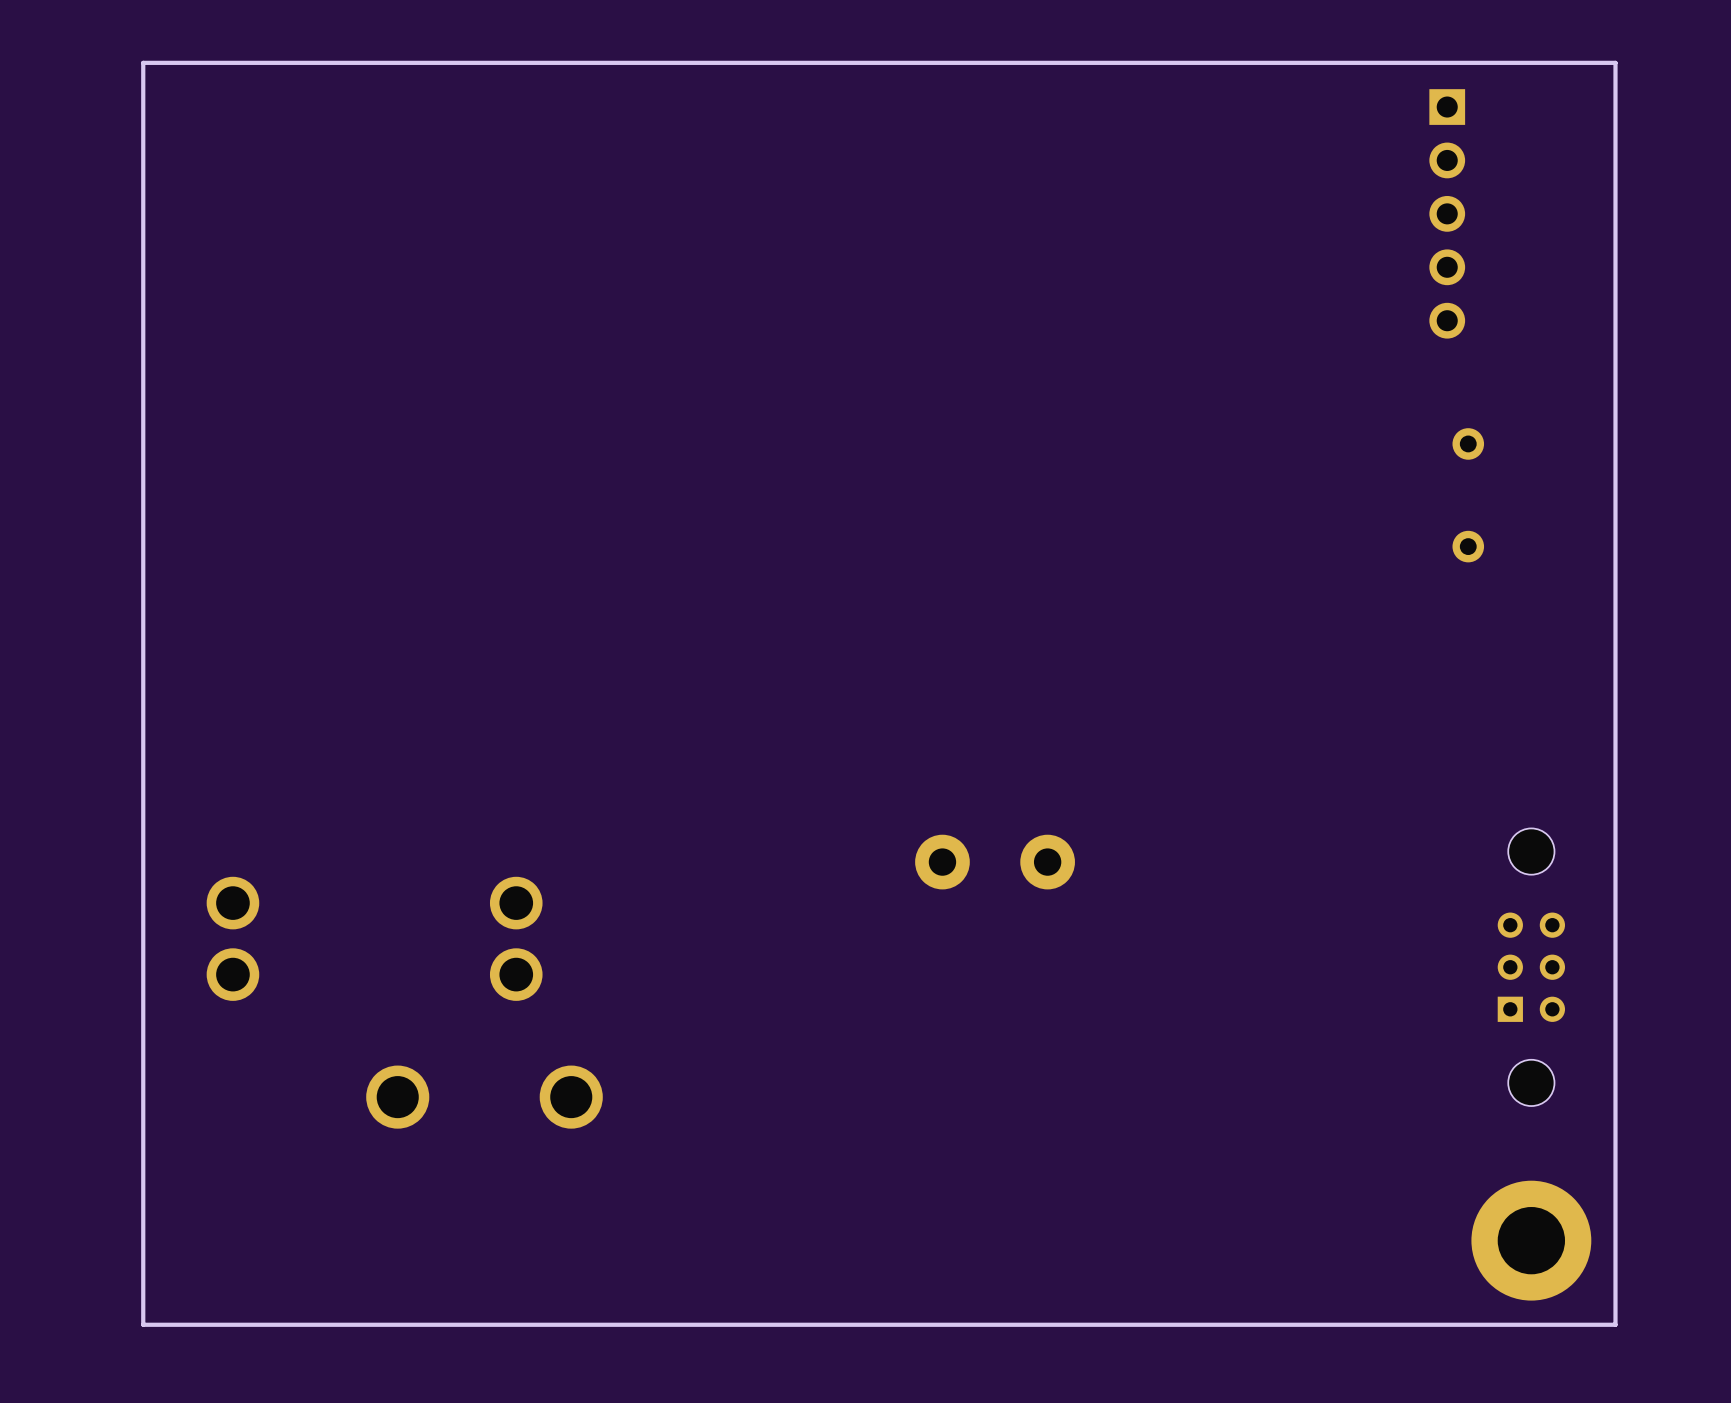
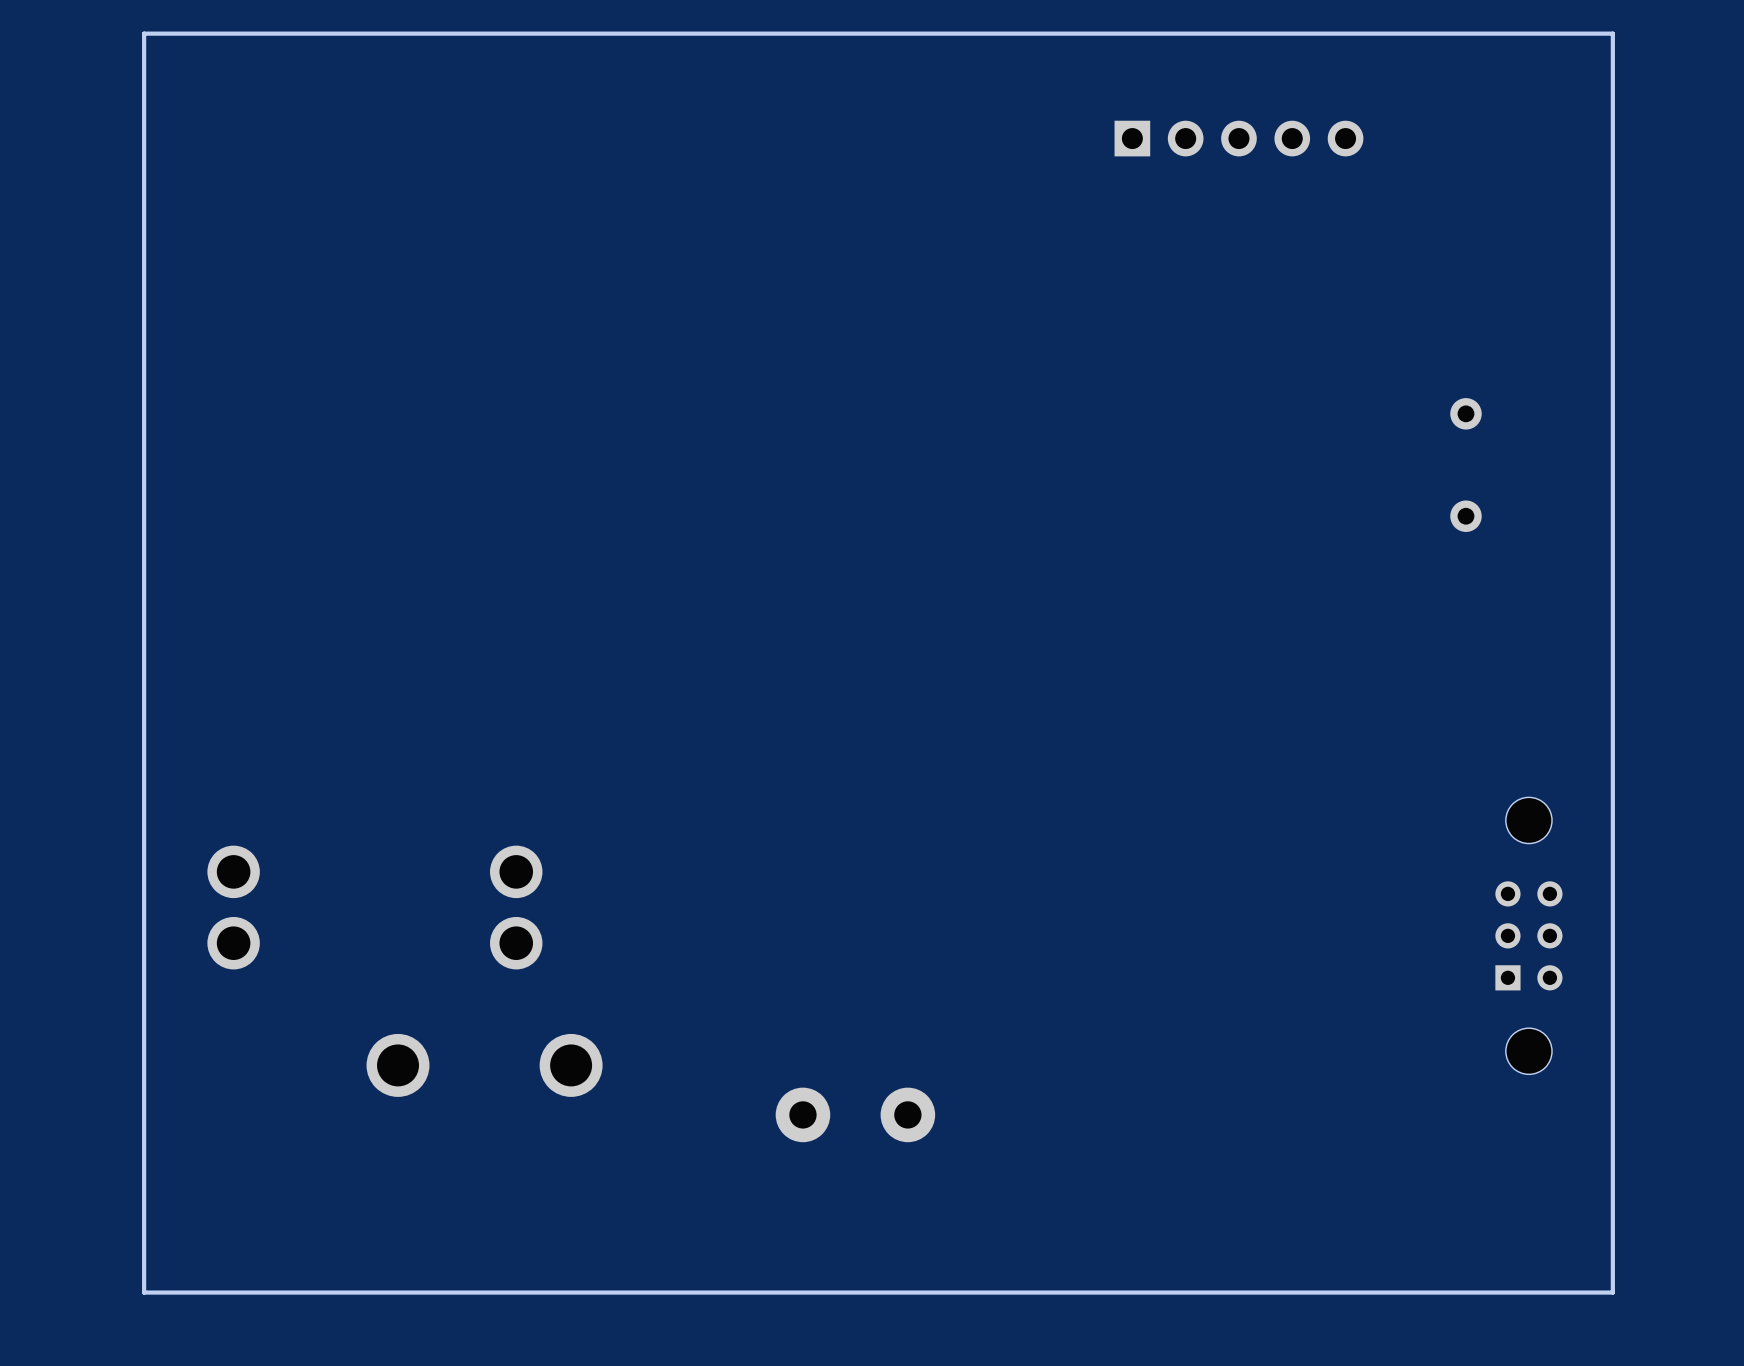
part rotation: 0° (1447, 213) -> 90° counterclockwise (1238, 138)
part position: (1447, 213) -> (1238, 138)
part position: (995, 862) -> (855, 1114)
part: (1531, 1240) -> none

